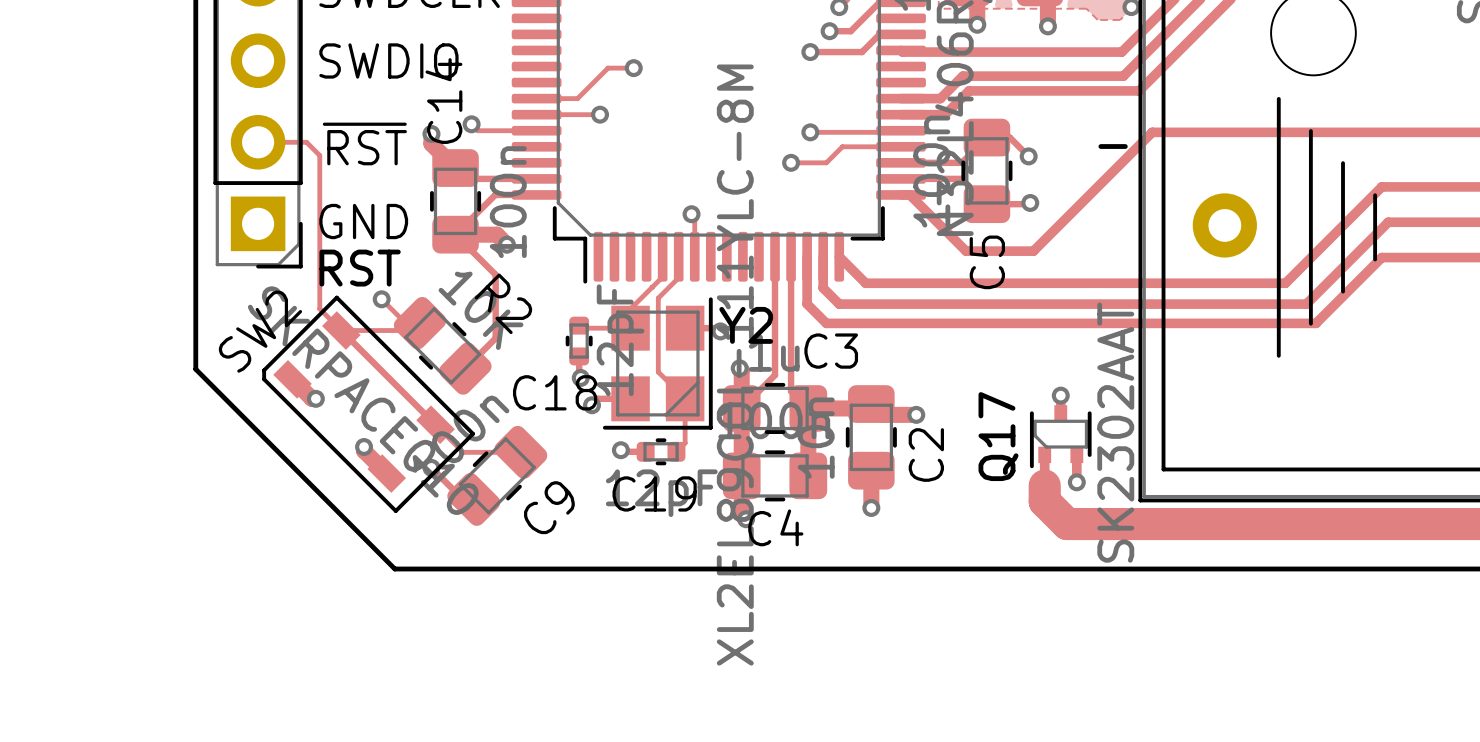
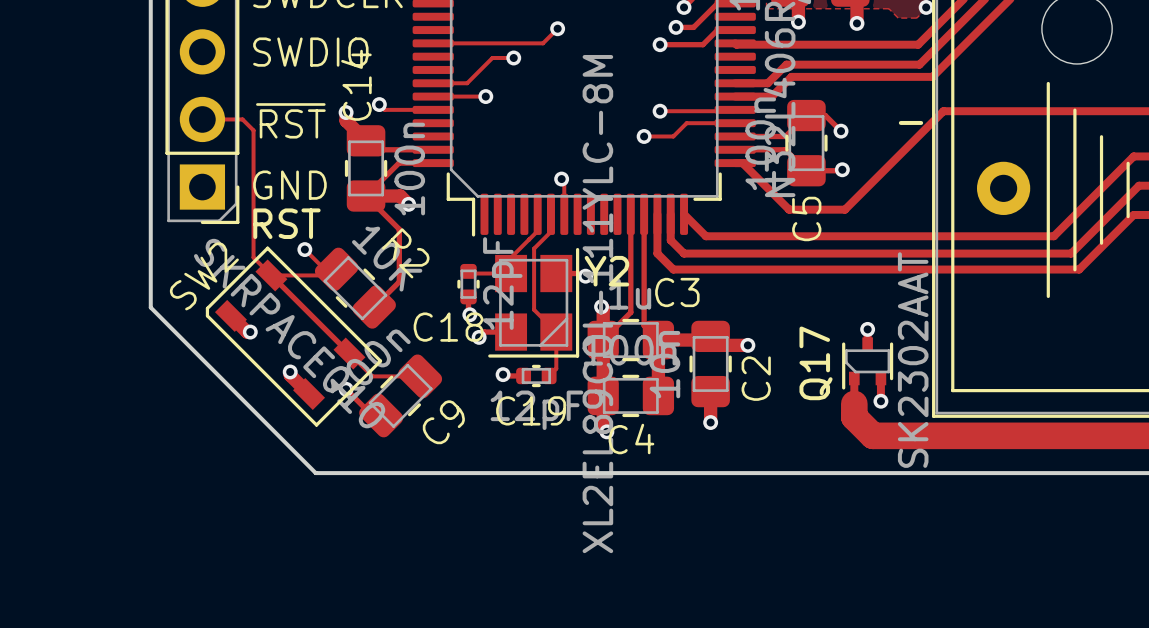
track: none -> (557, 28) (543, 43) (433, 43)
via: none -> (557, 28)

